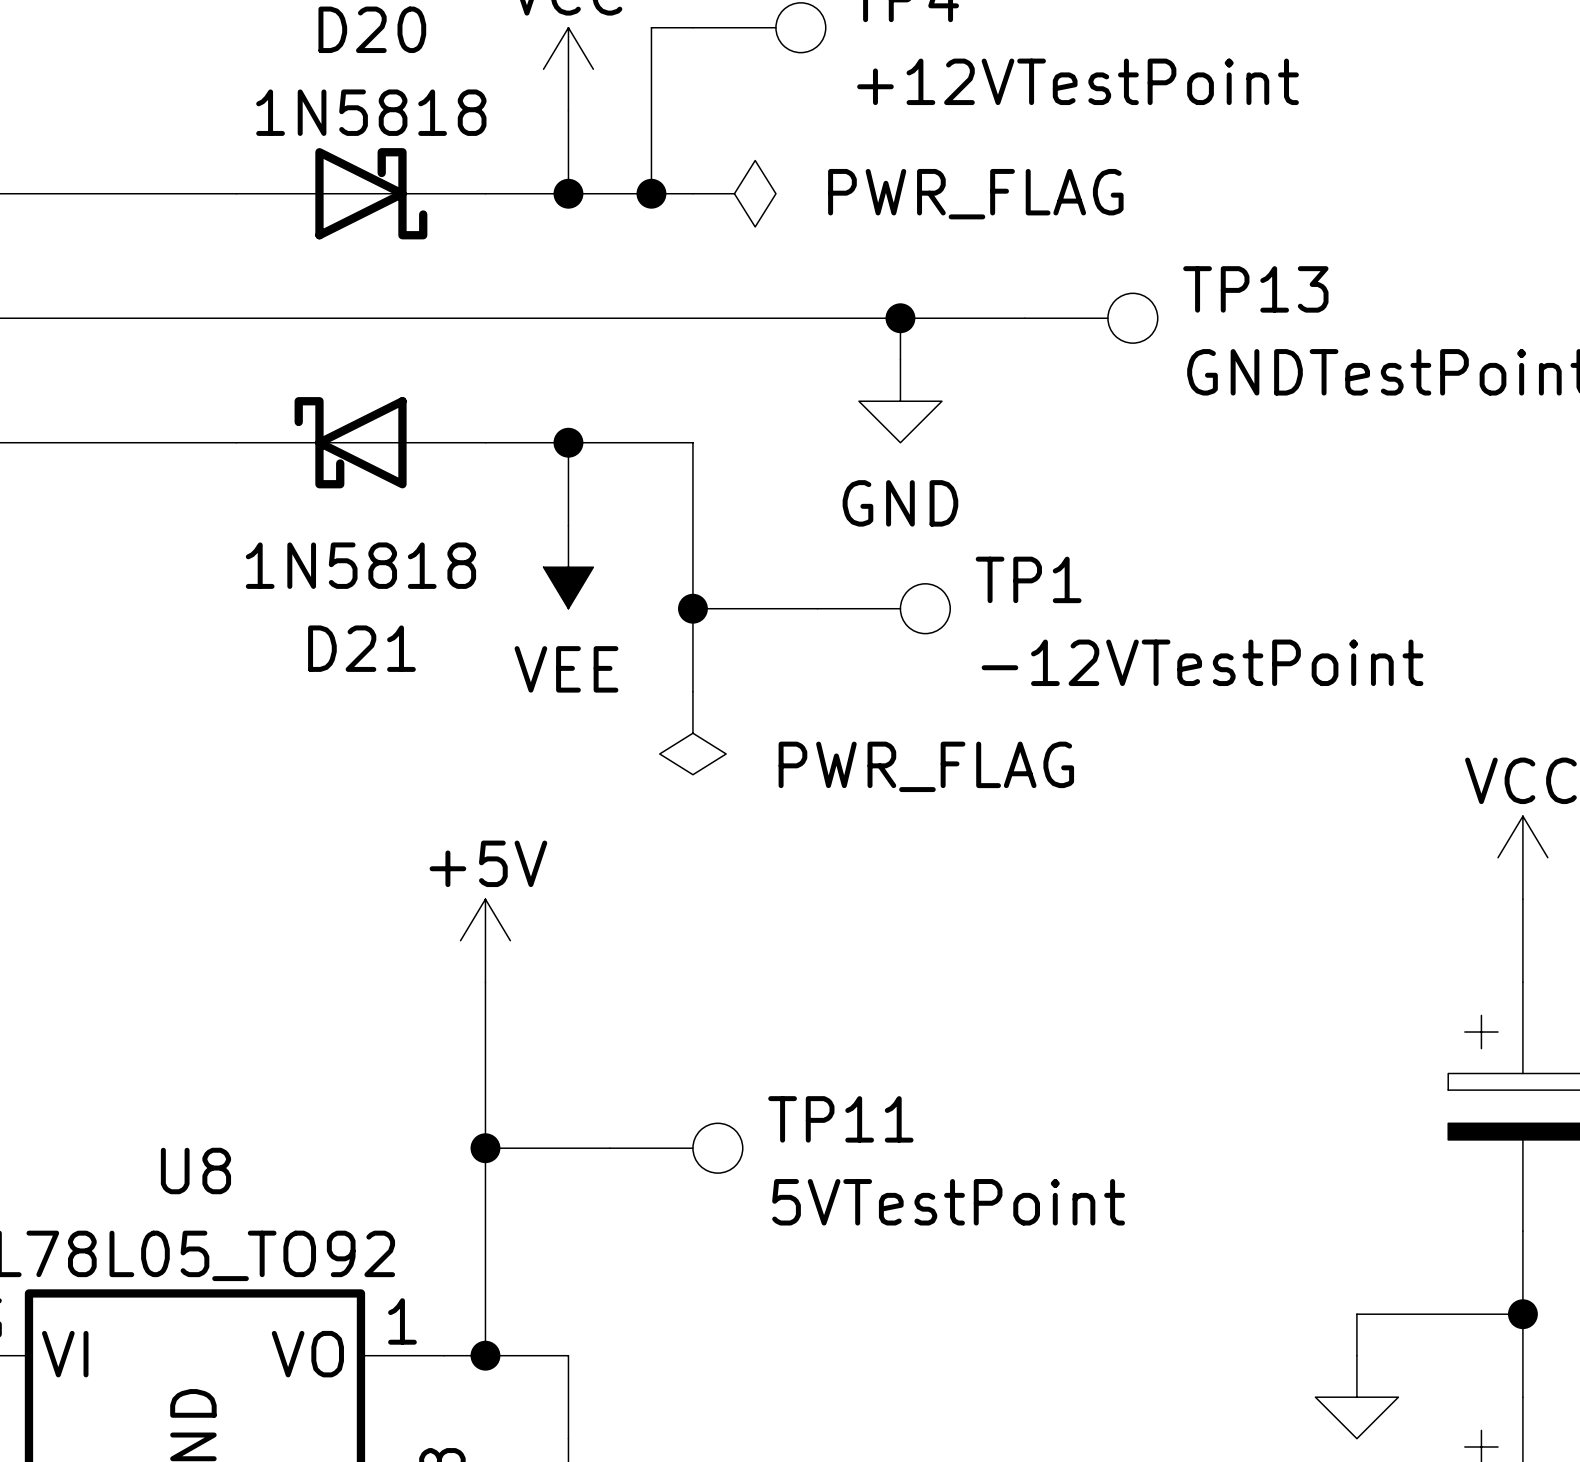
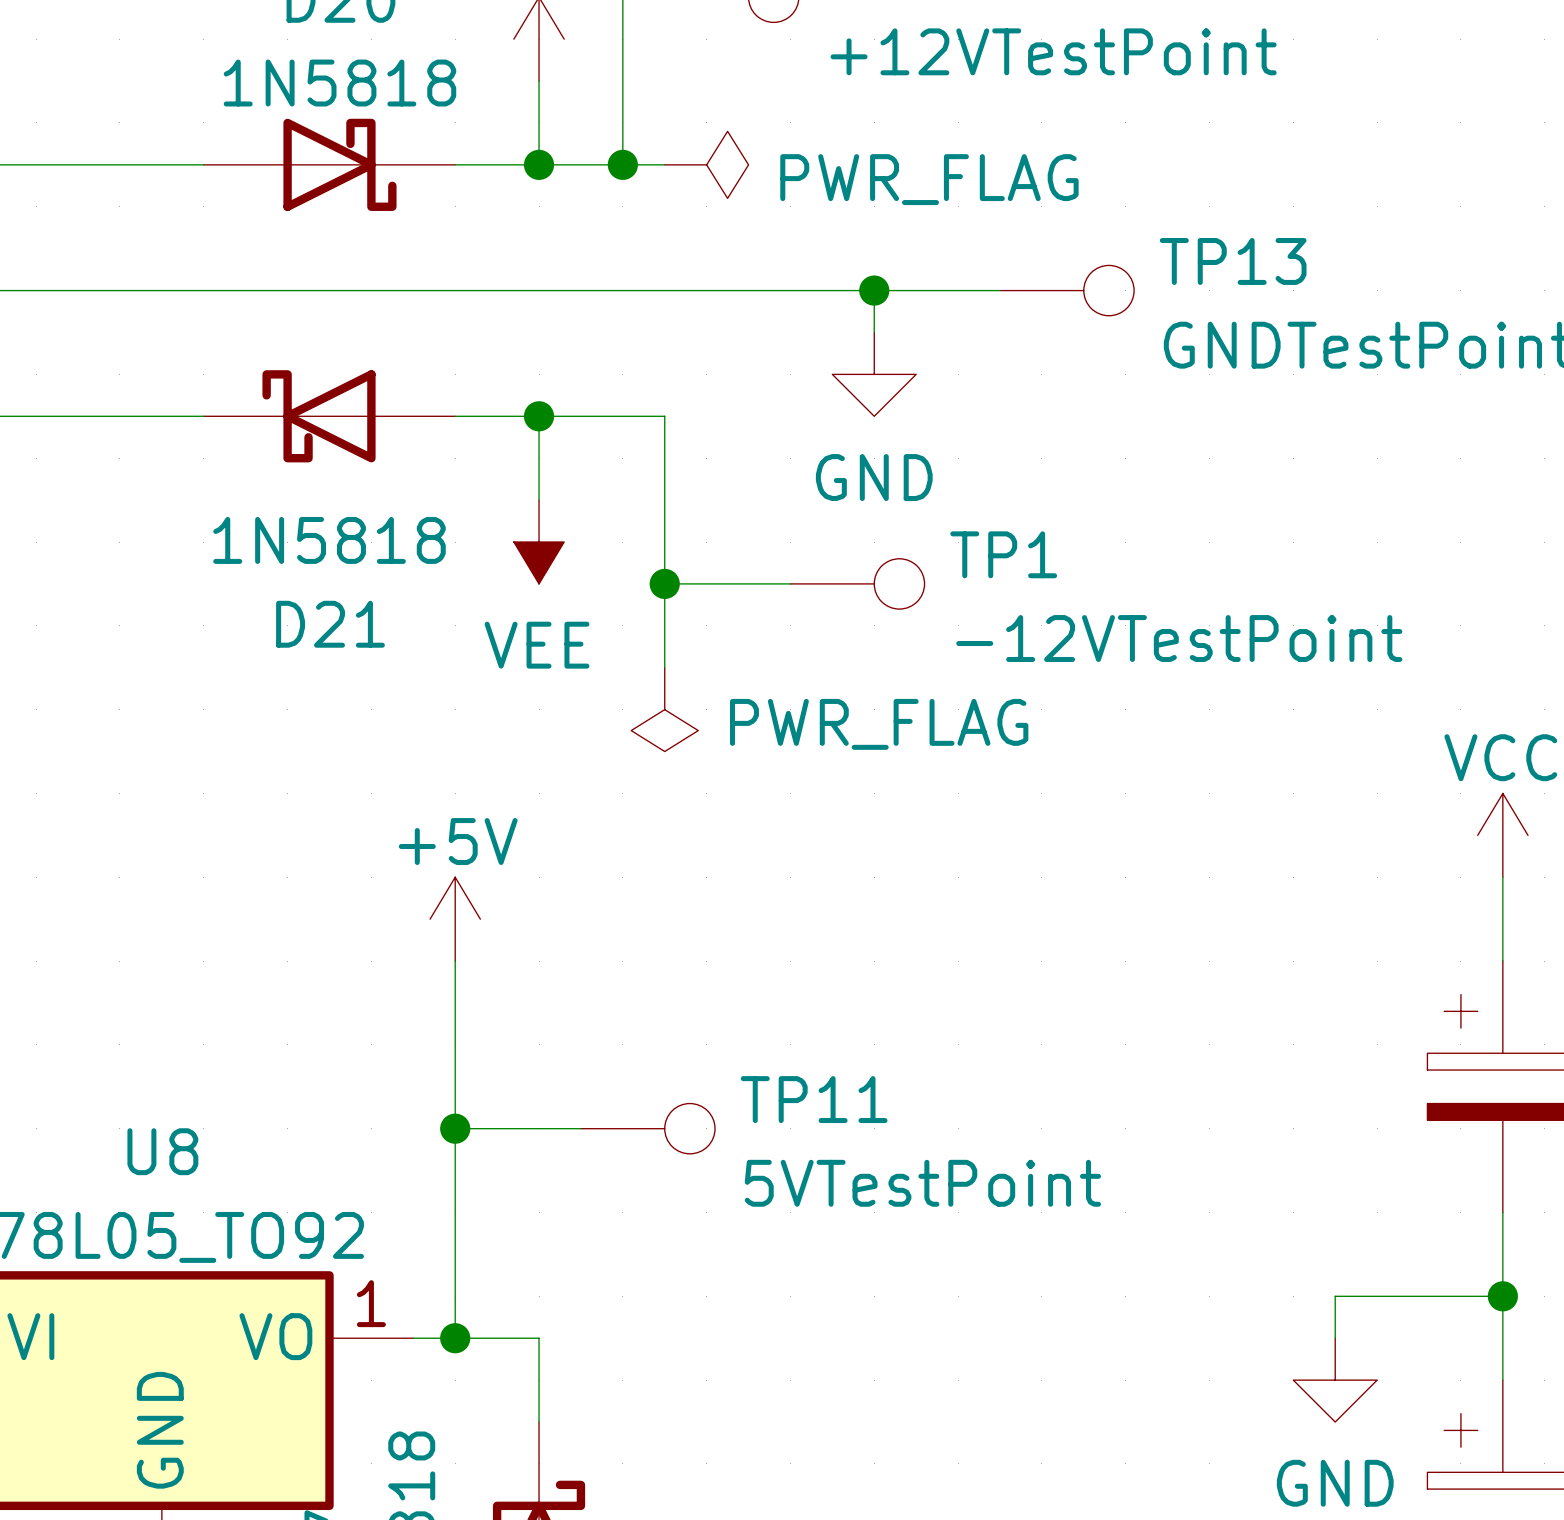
power symbol text position: PWR_FLAG (975, 194) -> PWR_FLAG (929, 179)
power symbol text position: PWR_FLAG (926, 766) -> PWR_FLAG (879, 724)

